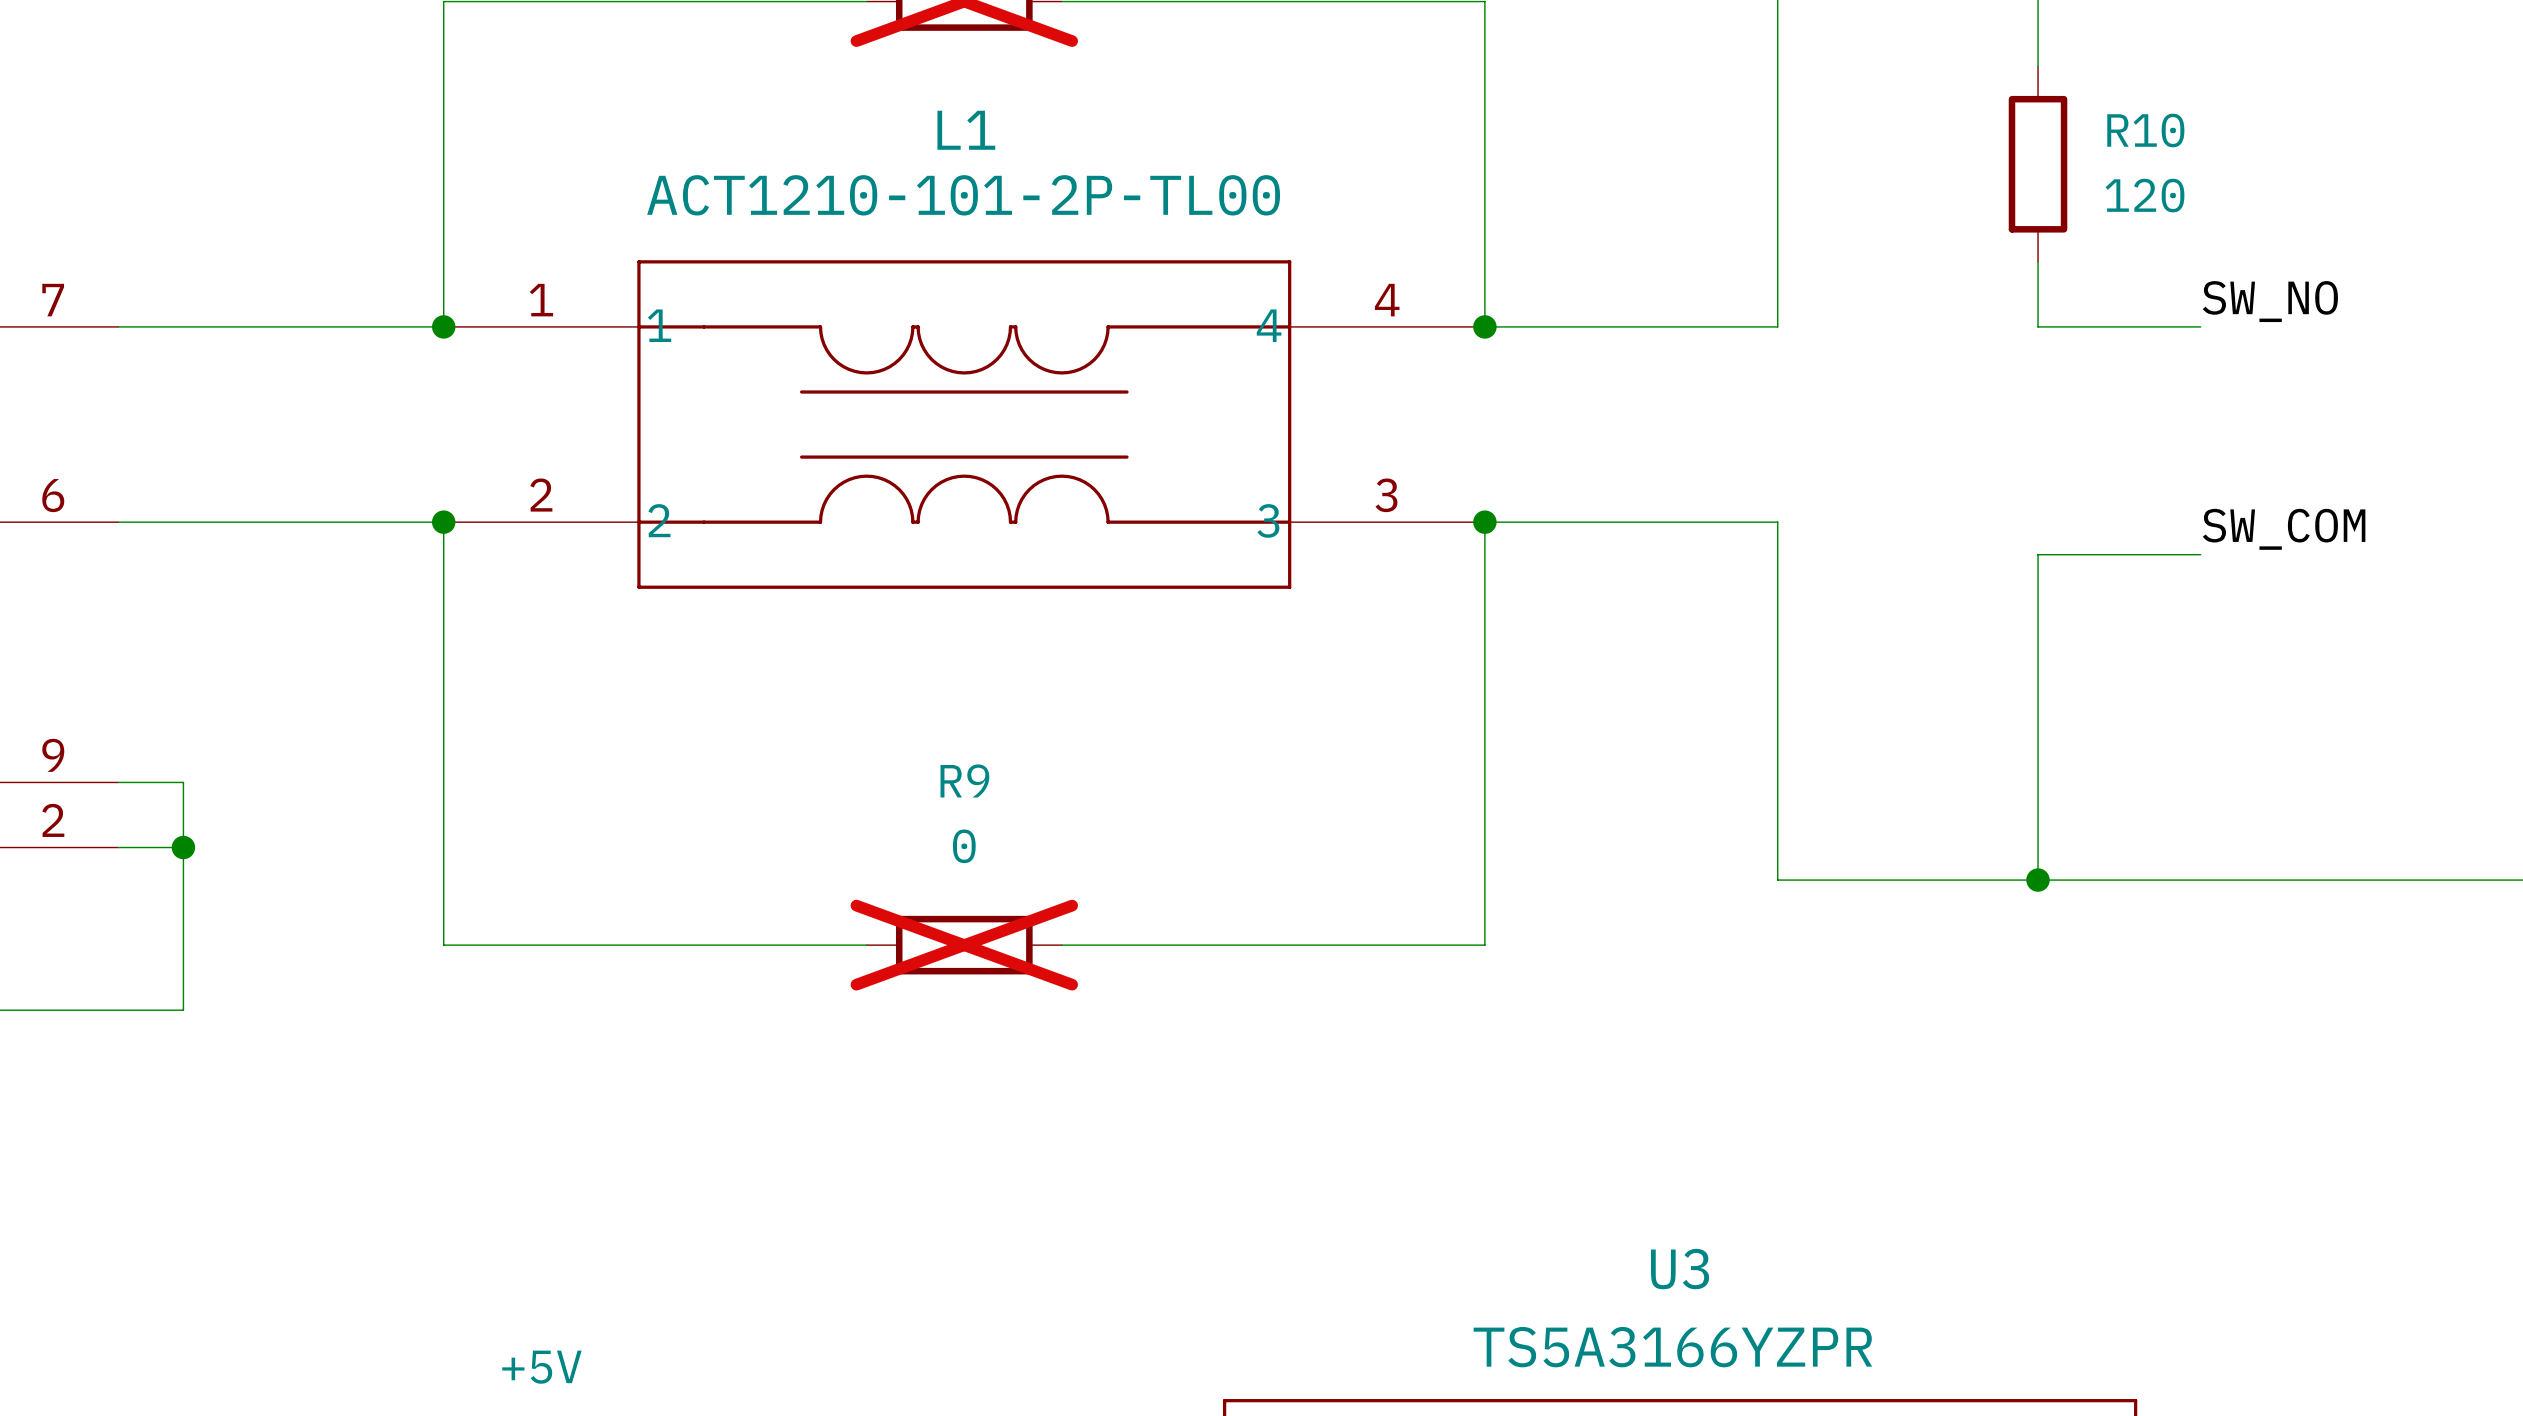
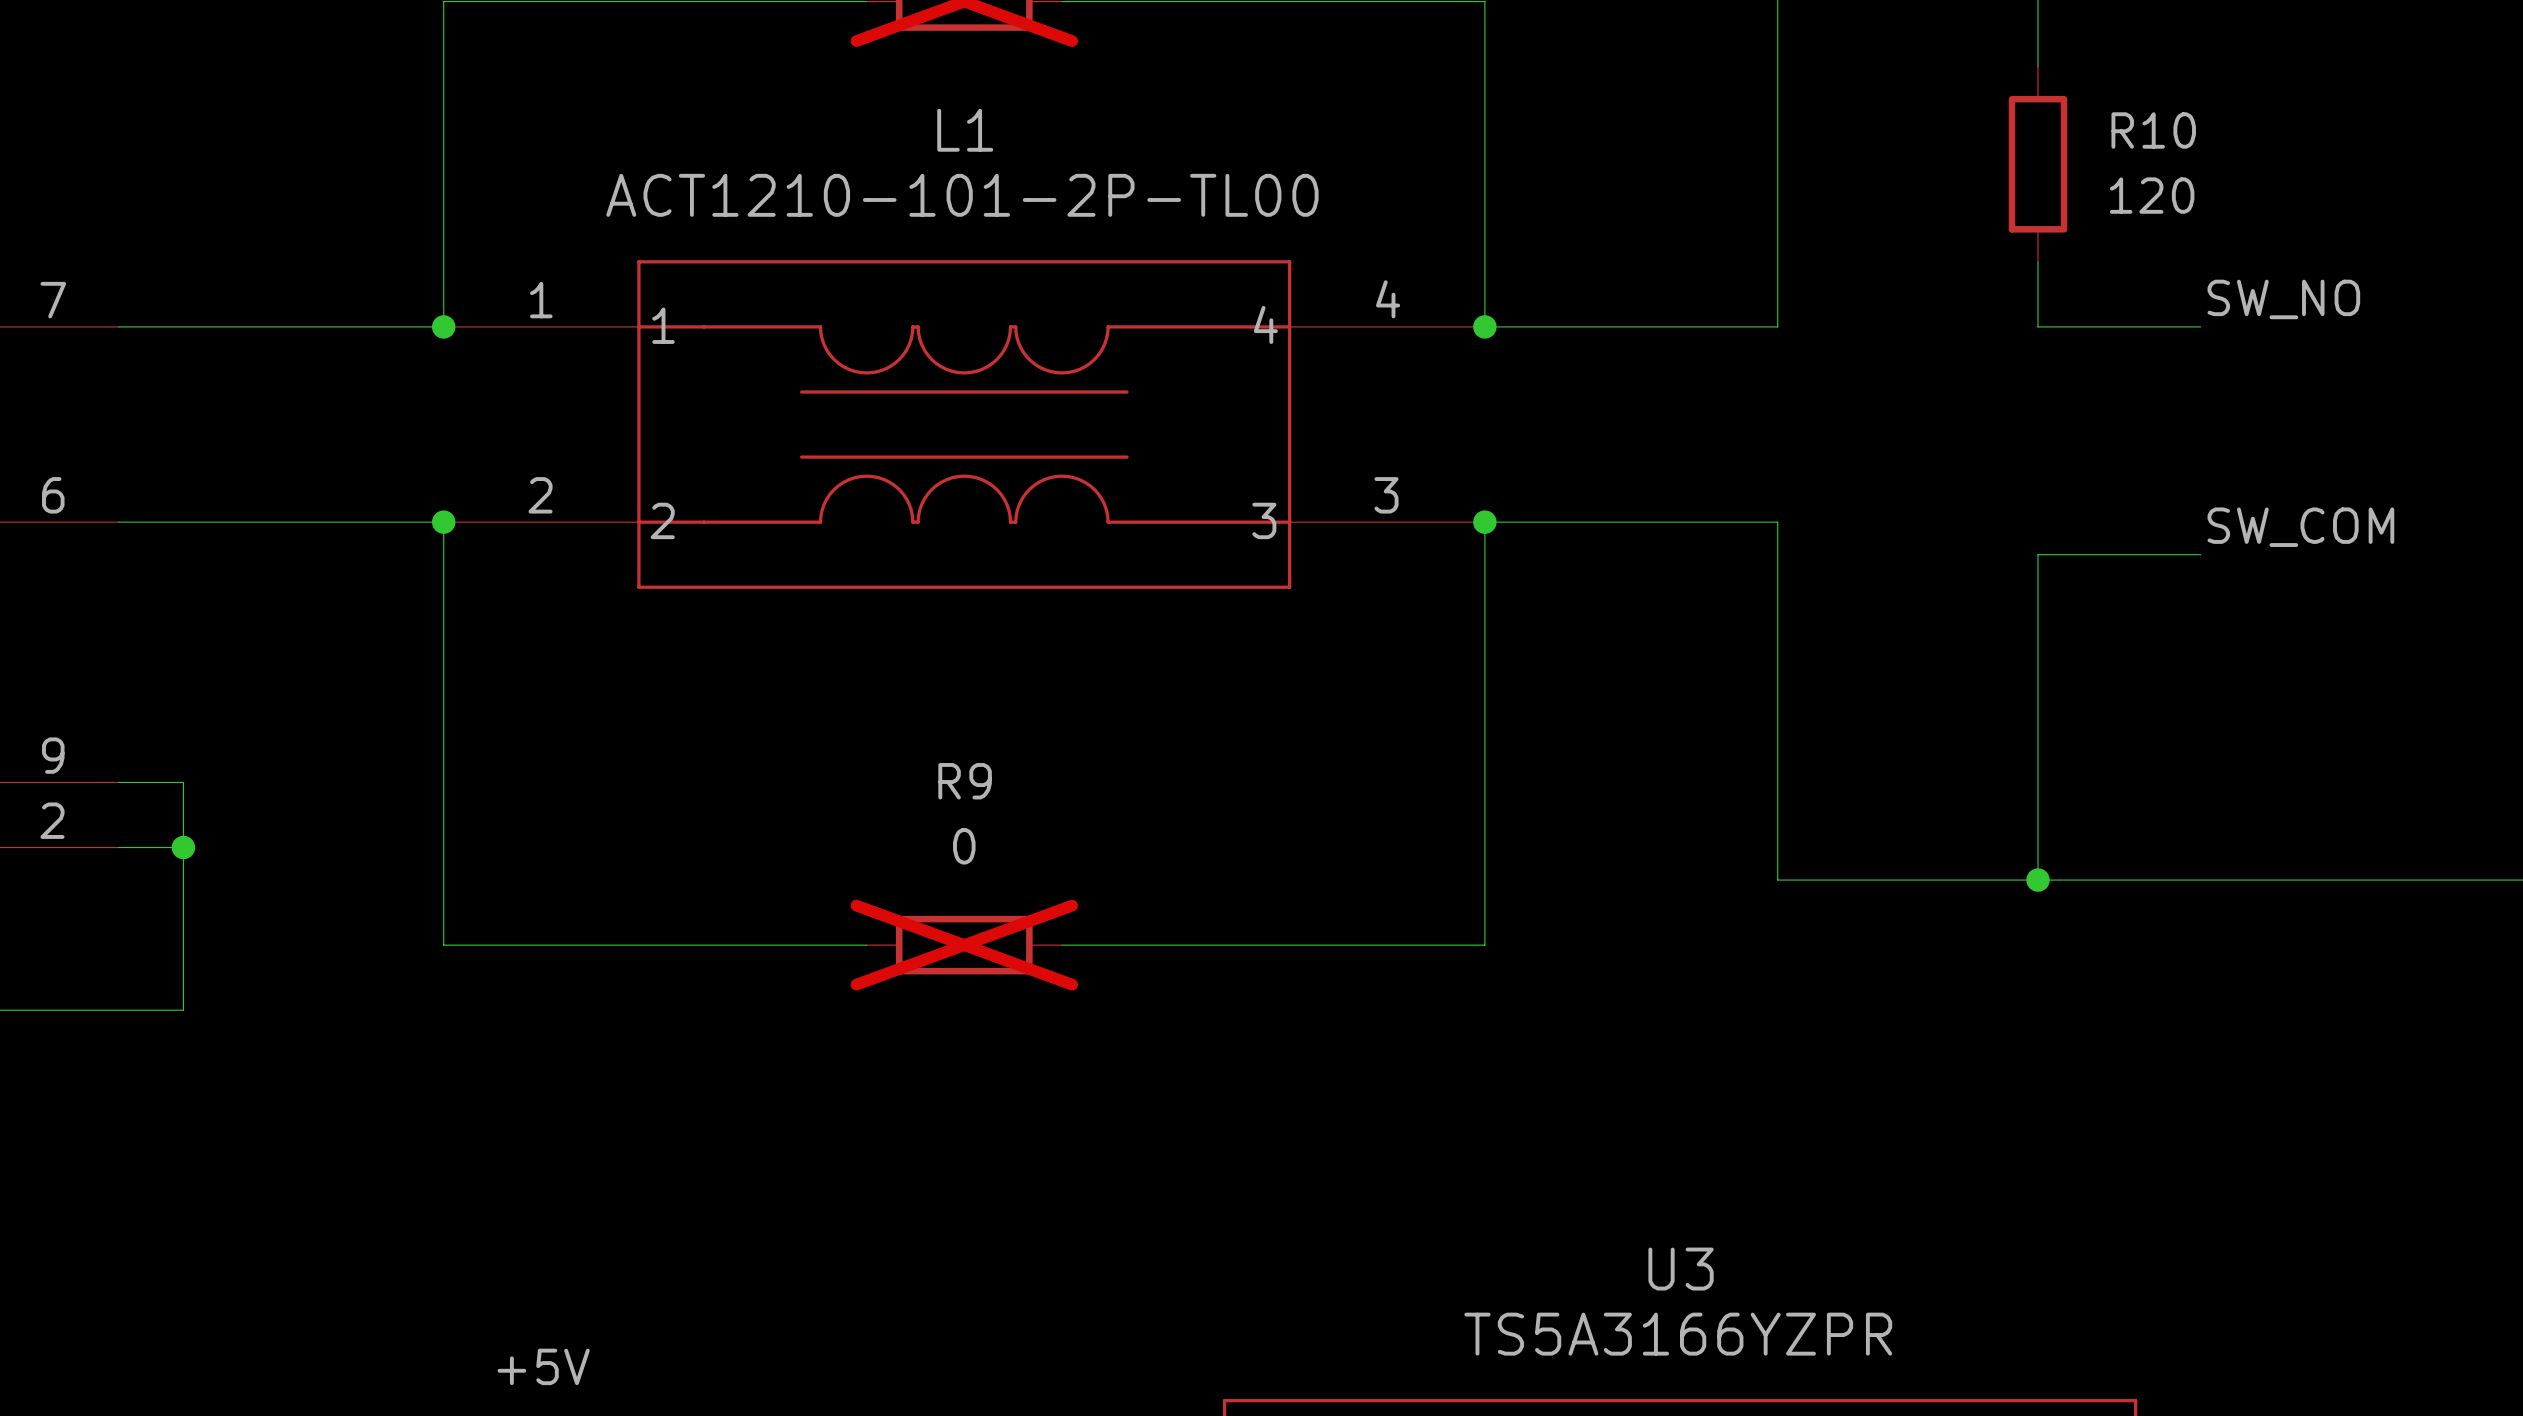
U3 value position: TS5A3166YZPR (1672, 1347) -> TS5A3166YZPR (1678, 1334)

